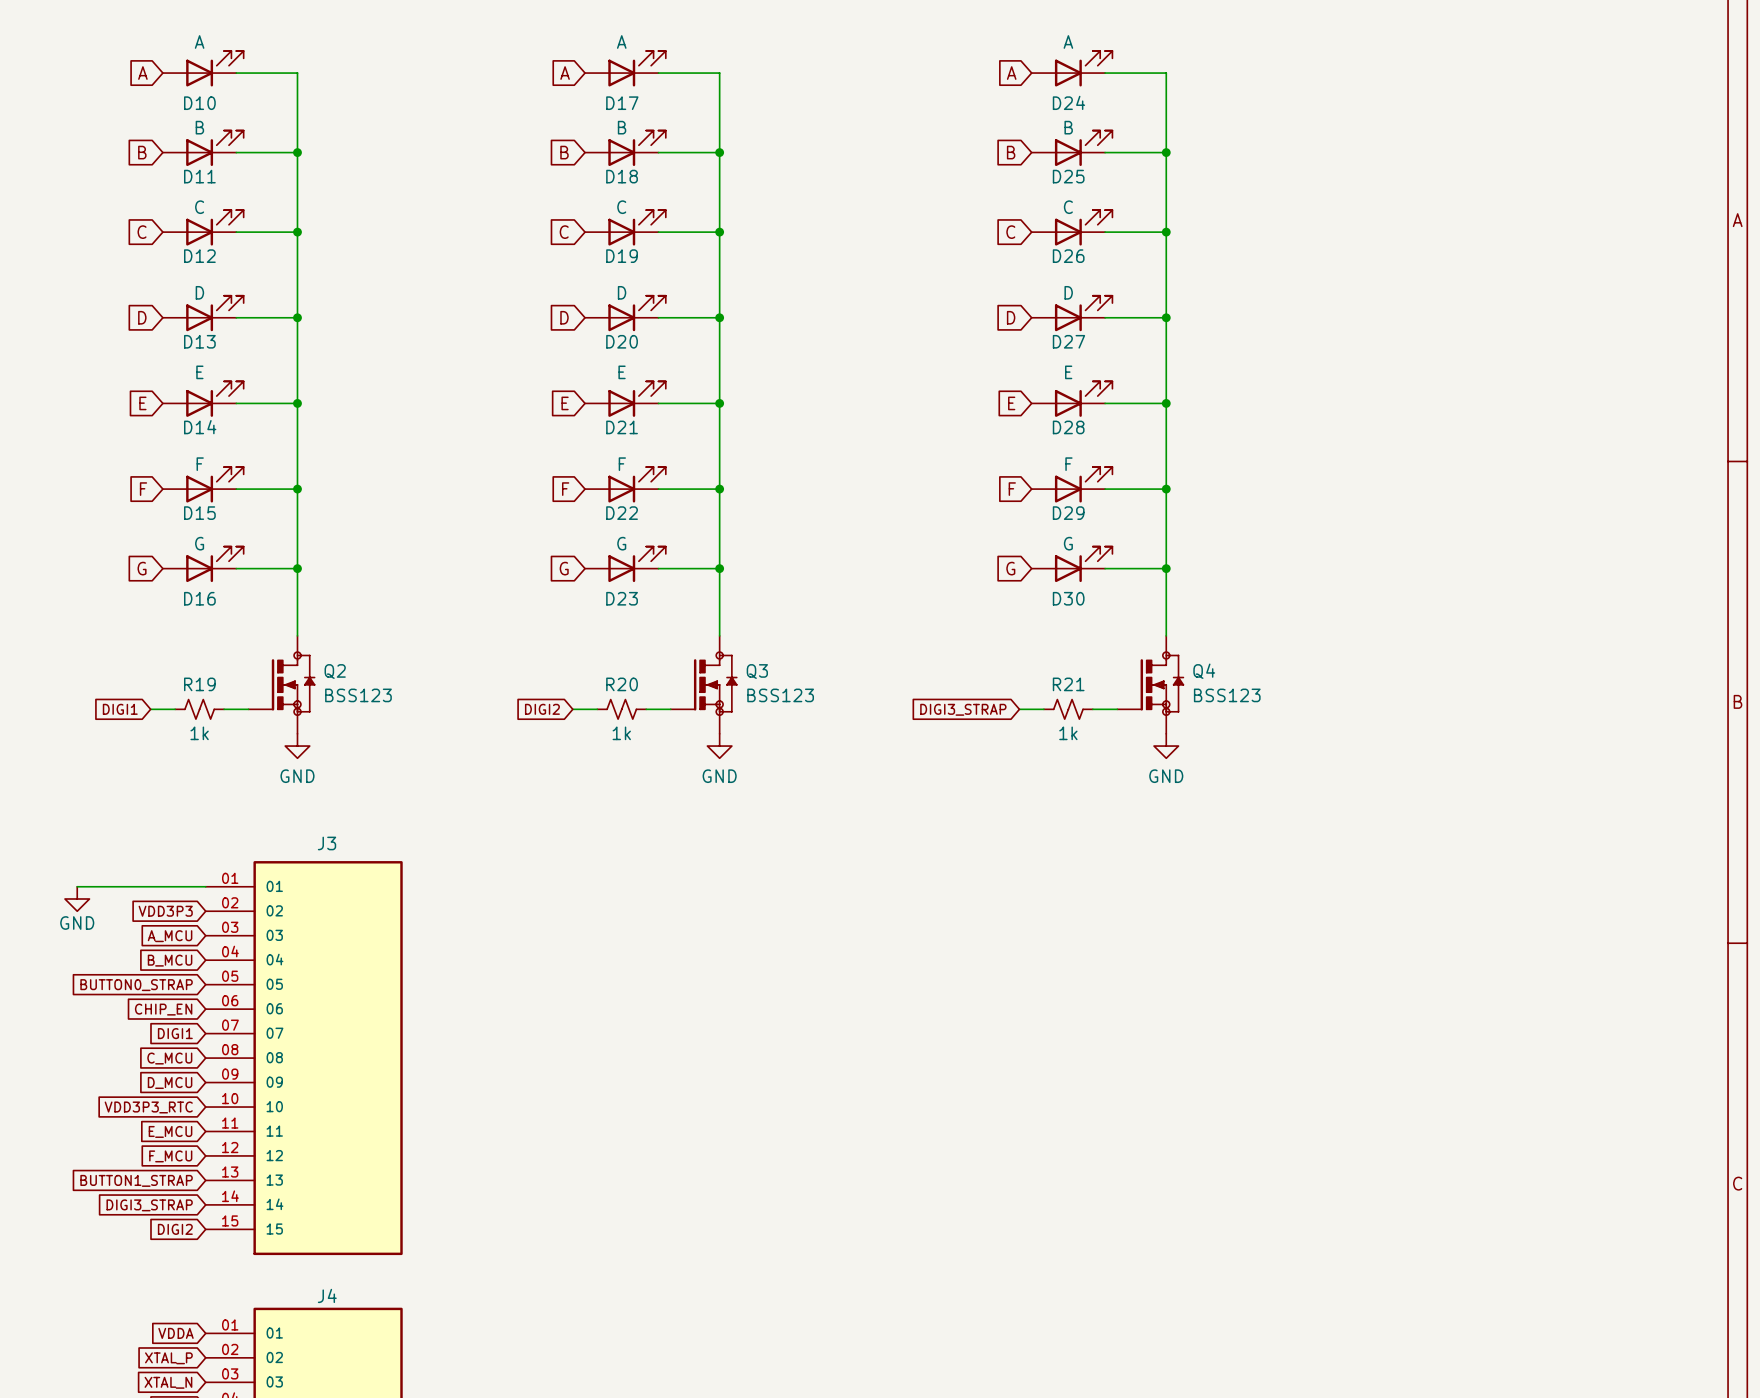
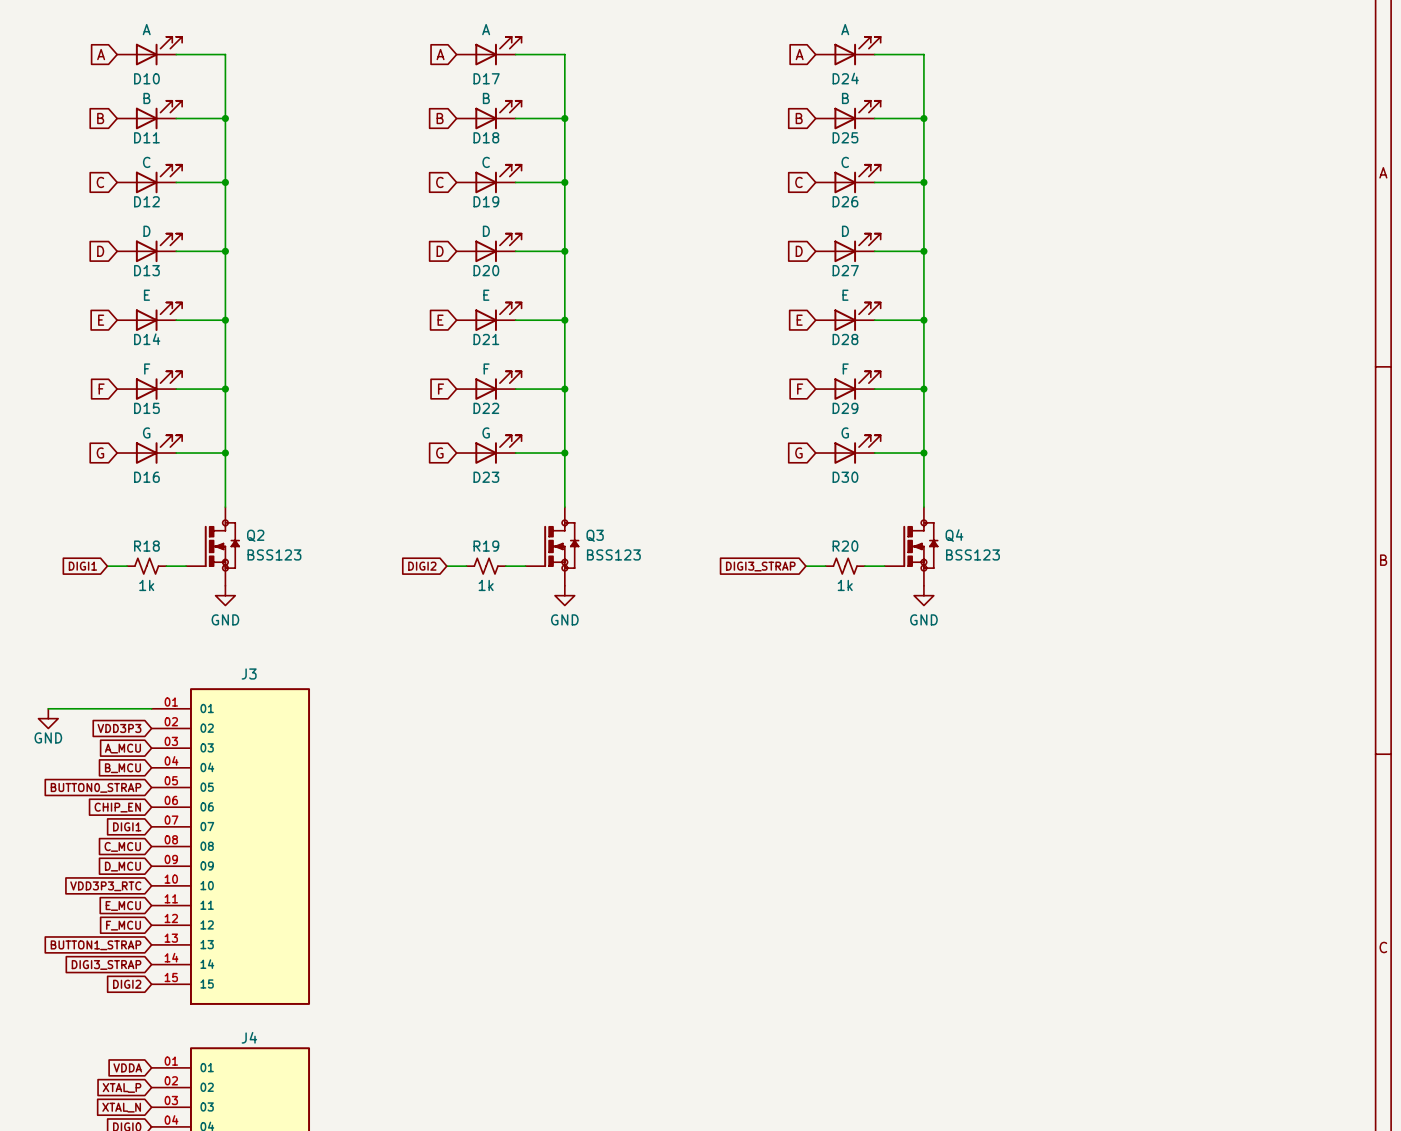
R19 name: R19 (199, 684) -> R18 (146, 546)
R20 name: R20 (622, 684) -> R19 (486, 546)
R21 name: R21 (1068, 684) -> R20 (845, 546)

